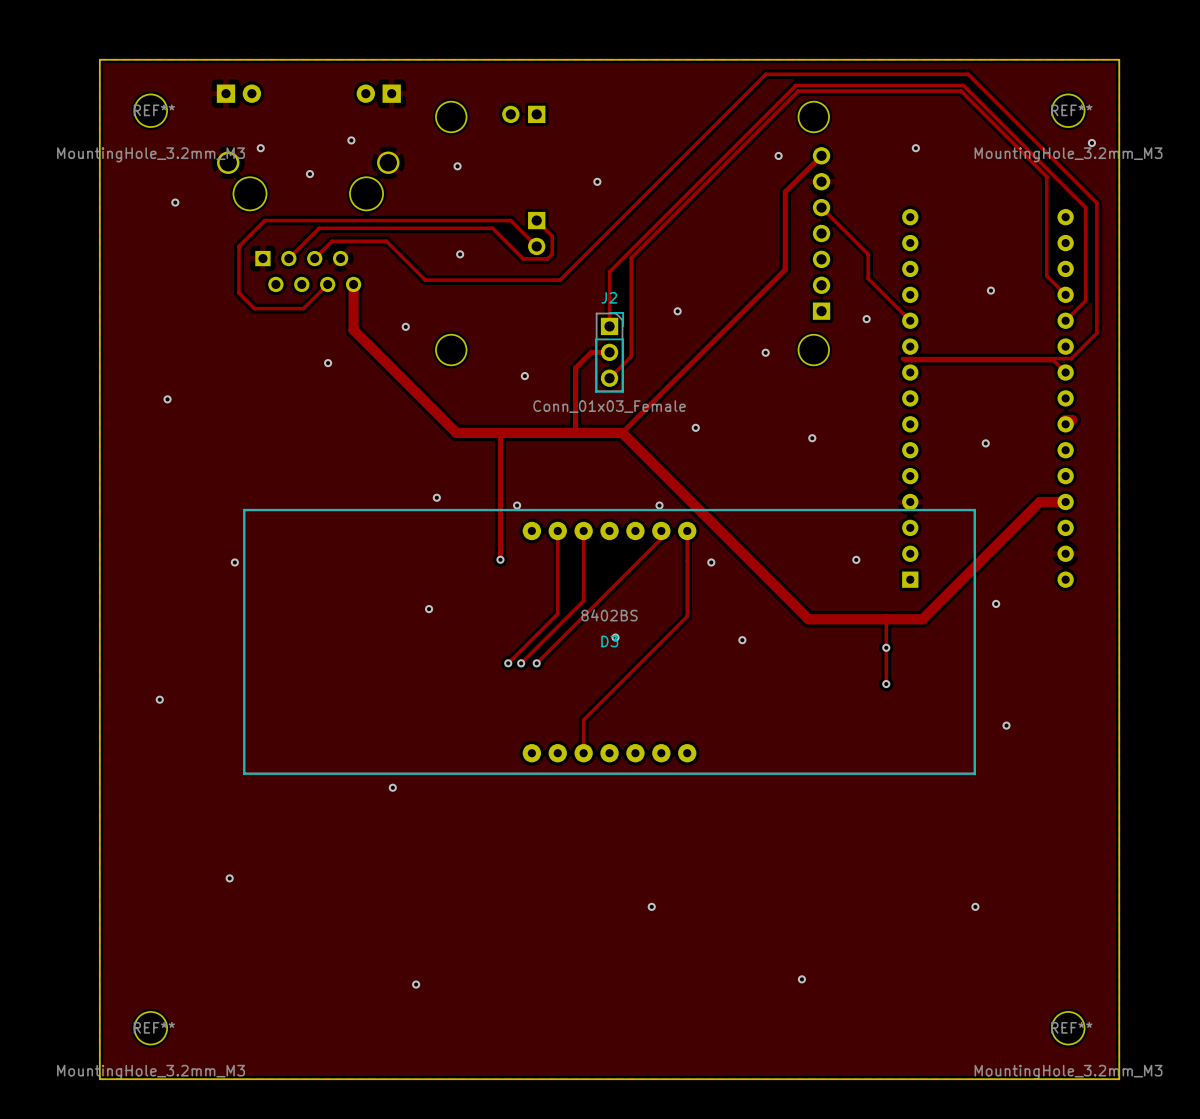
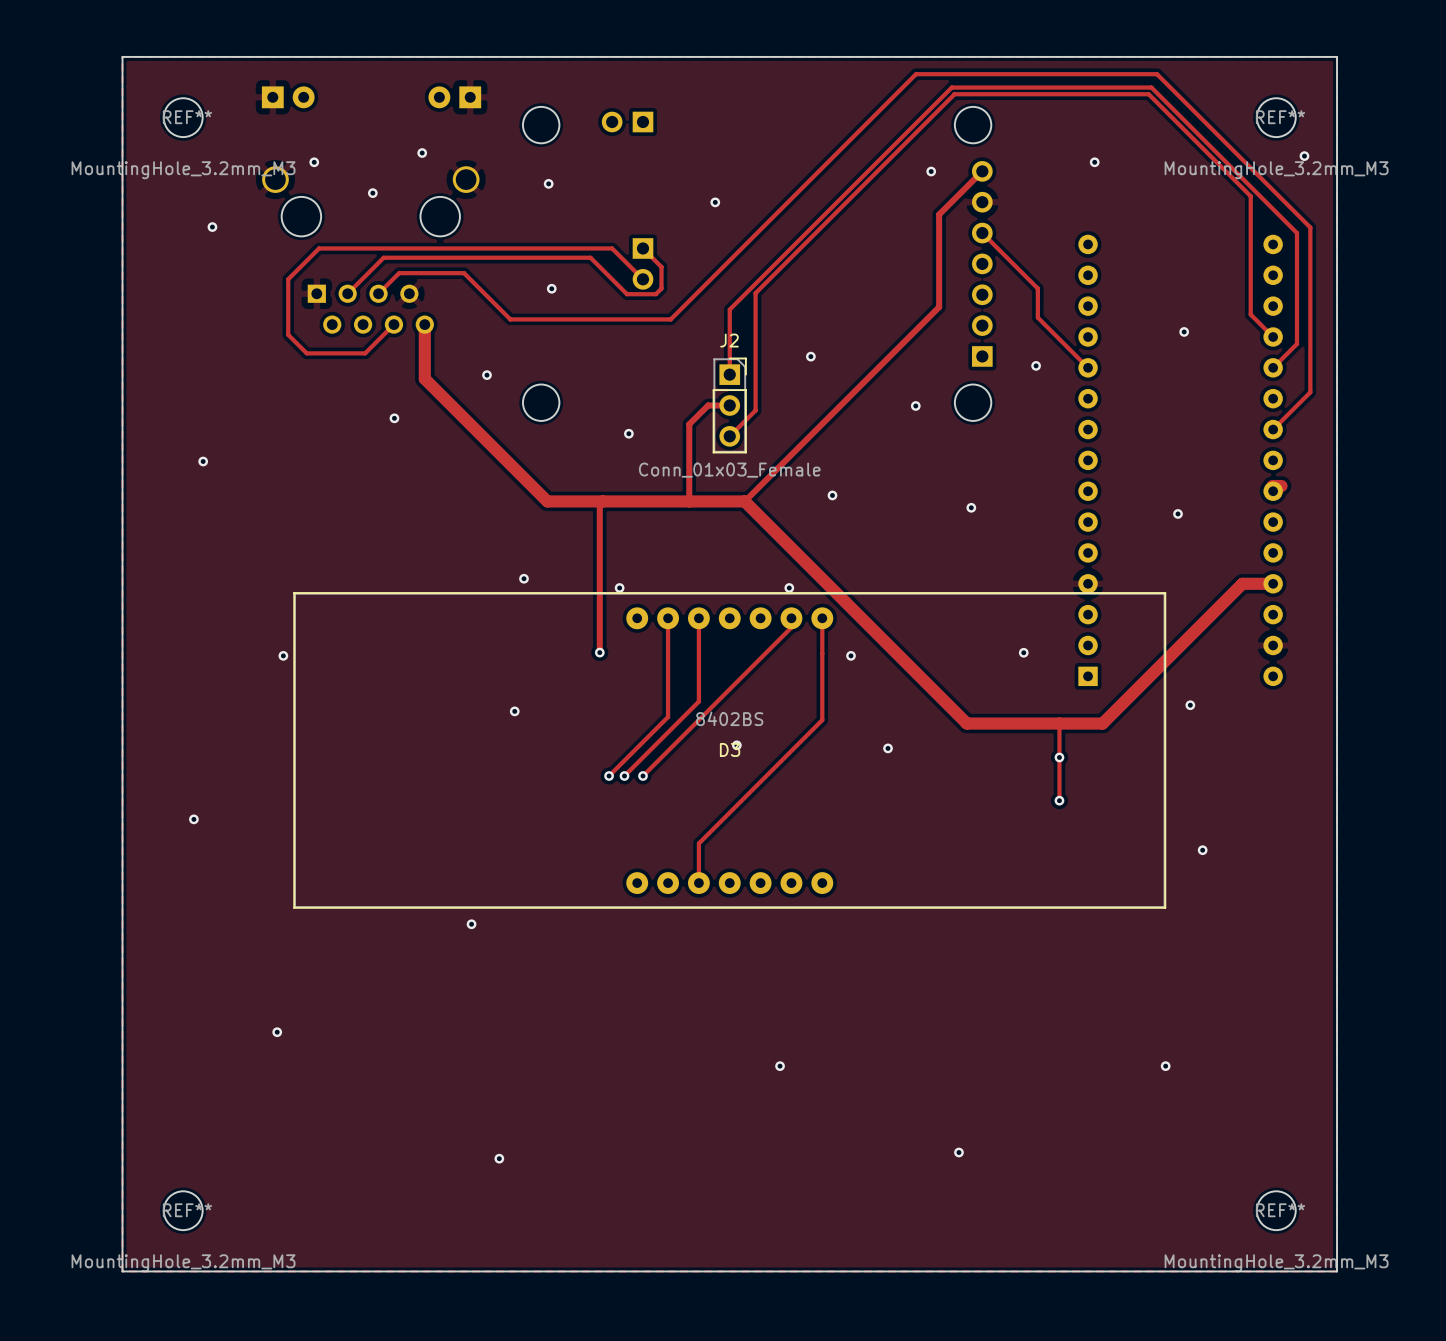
track: (1096, 333) (1071, 358) (902, 358) (904, 360) (1053, 360) (1065, 372) -> (1310, 382) (1310, 392) (1273, 429)

